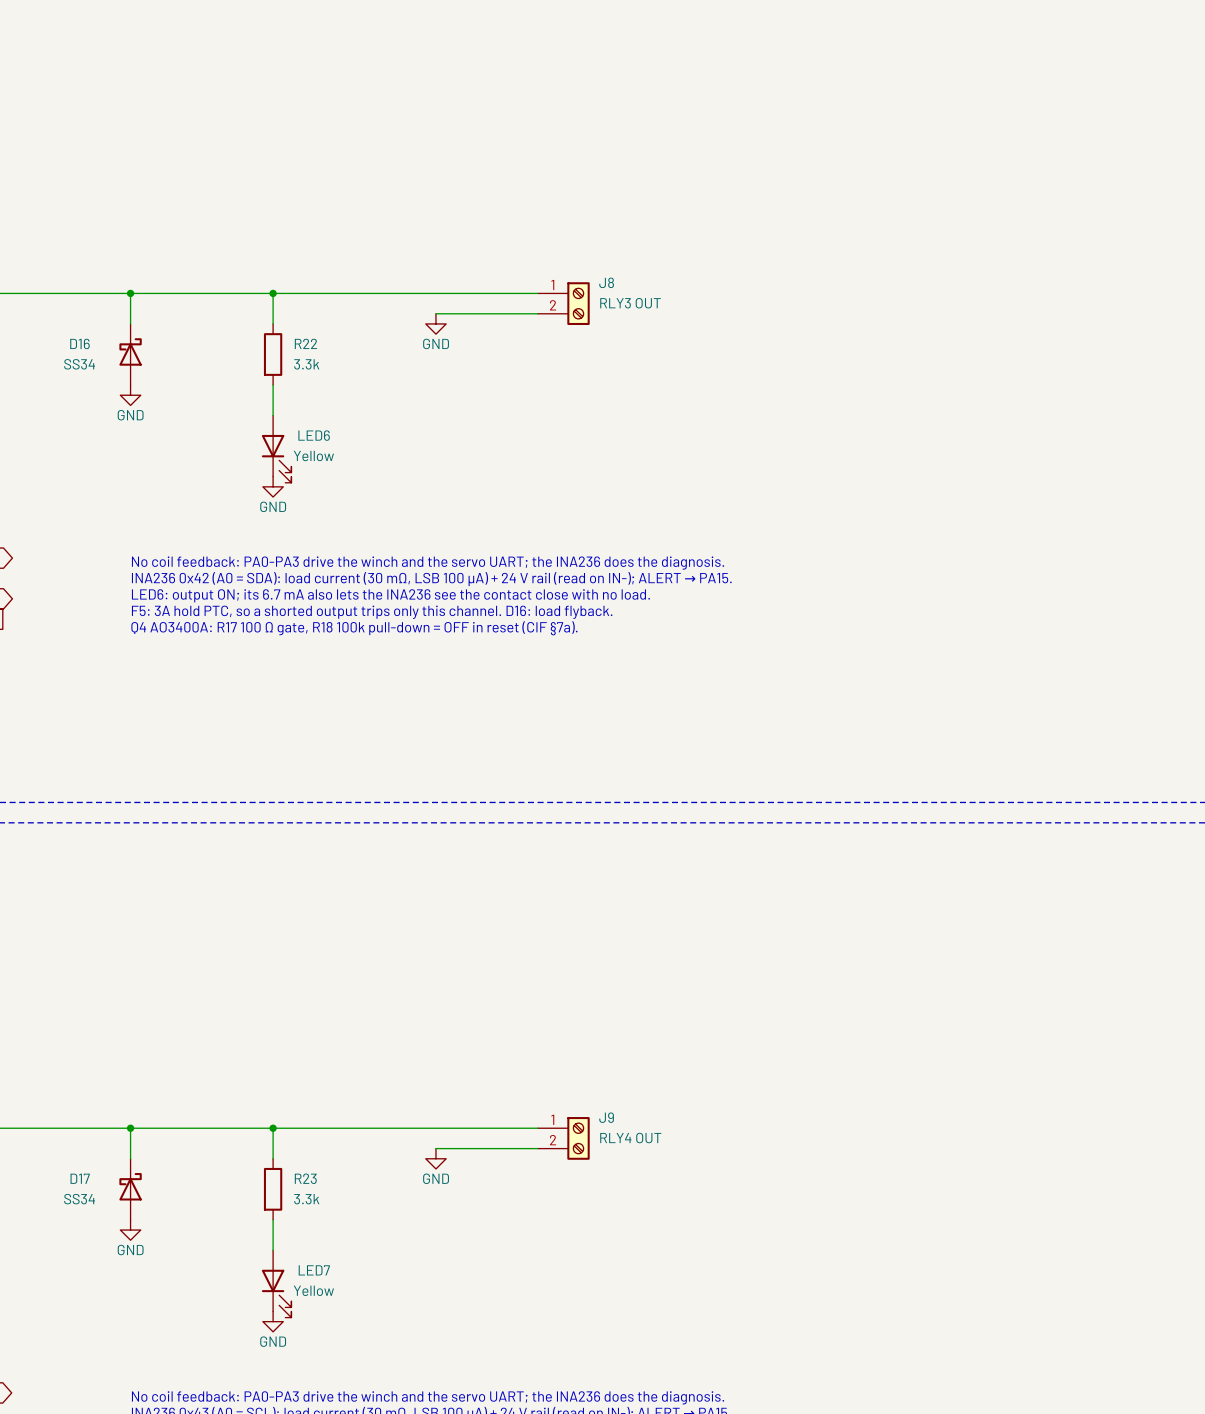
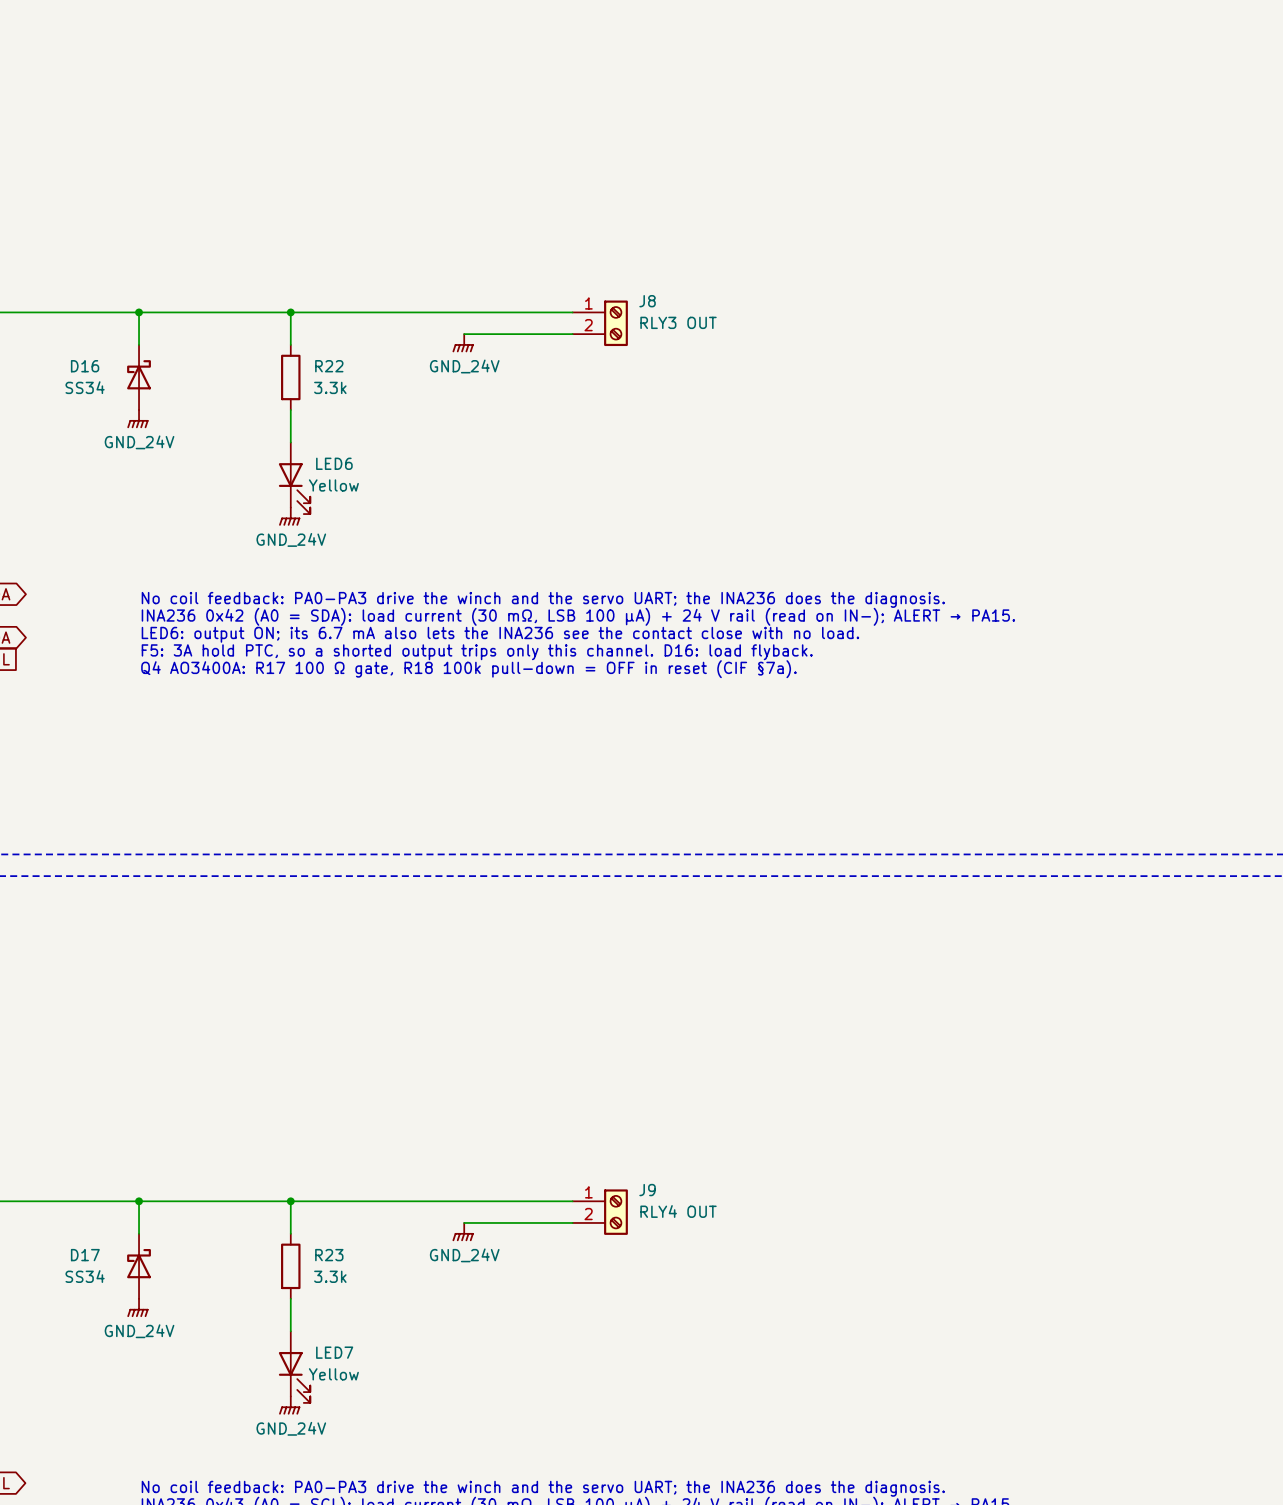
power symbol: GND (435, 323) -> GND_24V (463, 343)
power symbol: GND (130, 395) -> GND_24V (137, 419)
power symbol: GND (273, 486) -> GND_24V (289, 516)
power symbol: GND (435, 1158) -> GND_24V (463, 1232)
power symbol: GND (130, 1230) -> GND_24V (137, 1307)
power symbol: GND (273, 1321) -> GND_24V (289, 1405)

